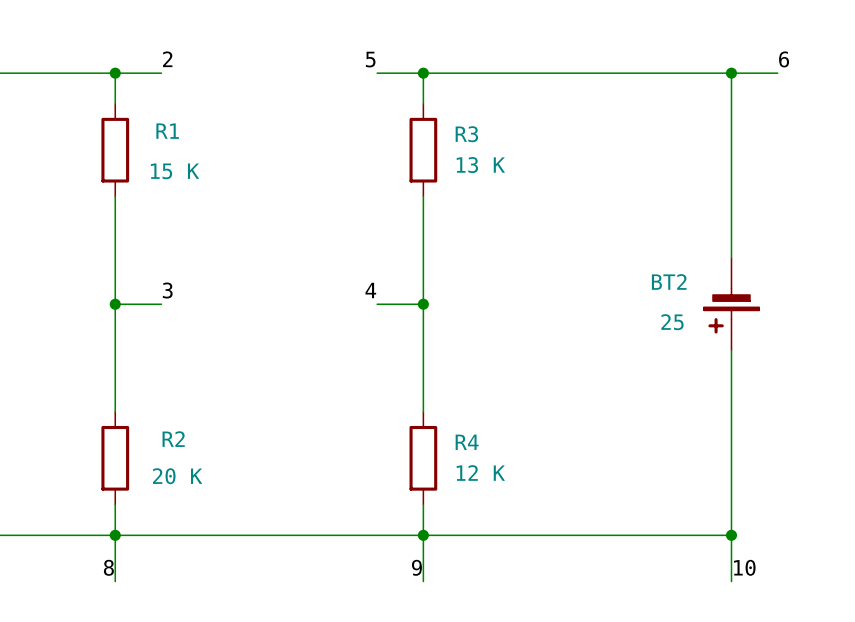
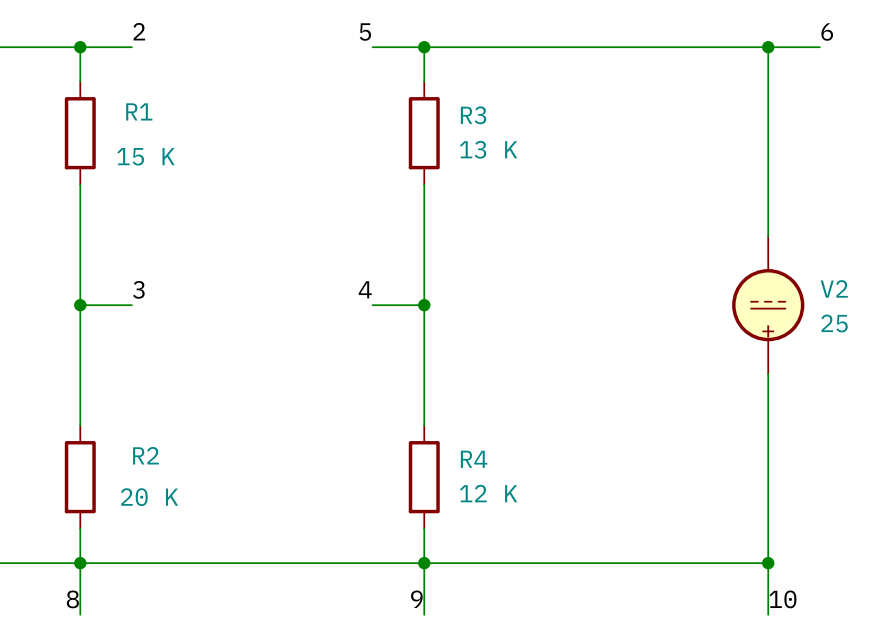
BT2: 25 (731, 304) -> none
V2: none -> 25 (768, 305)

